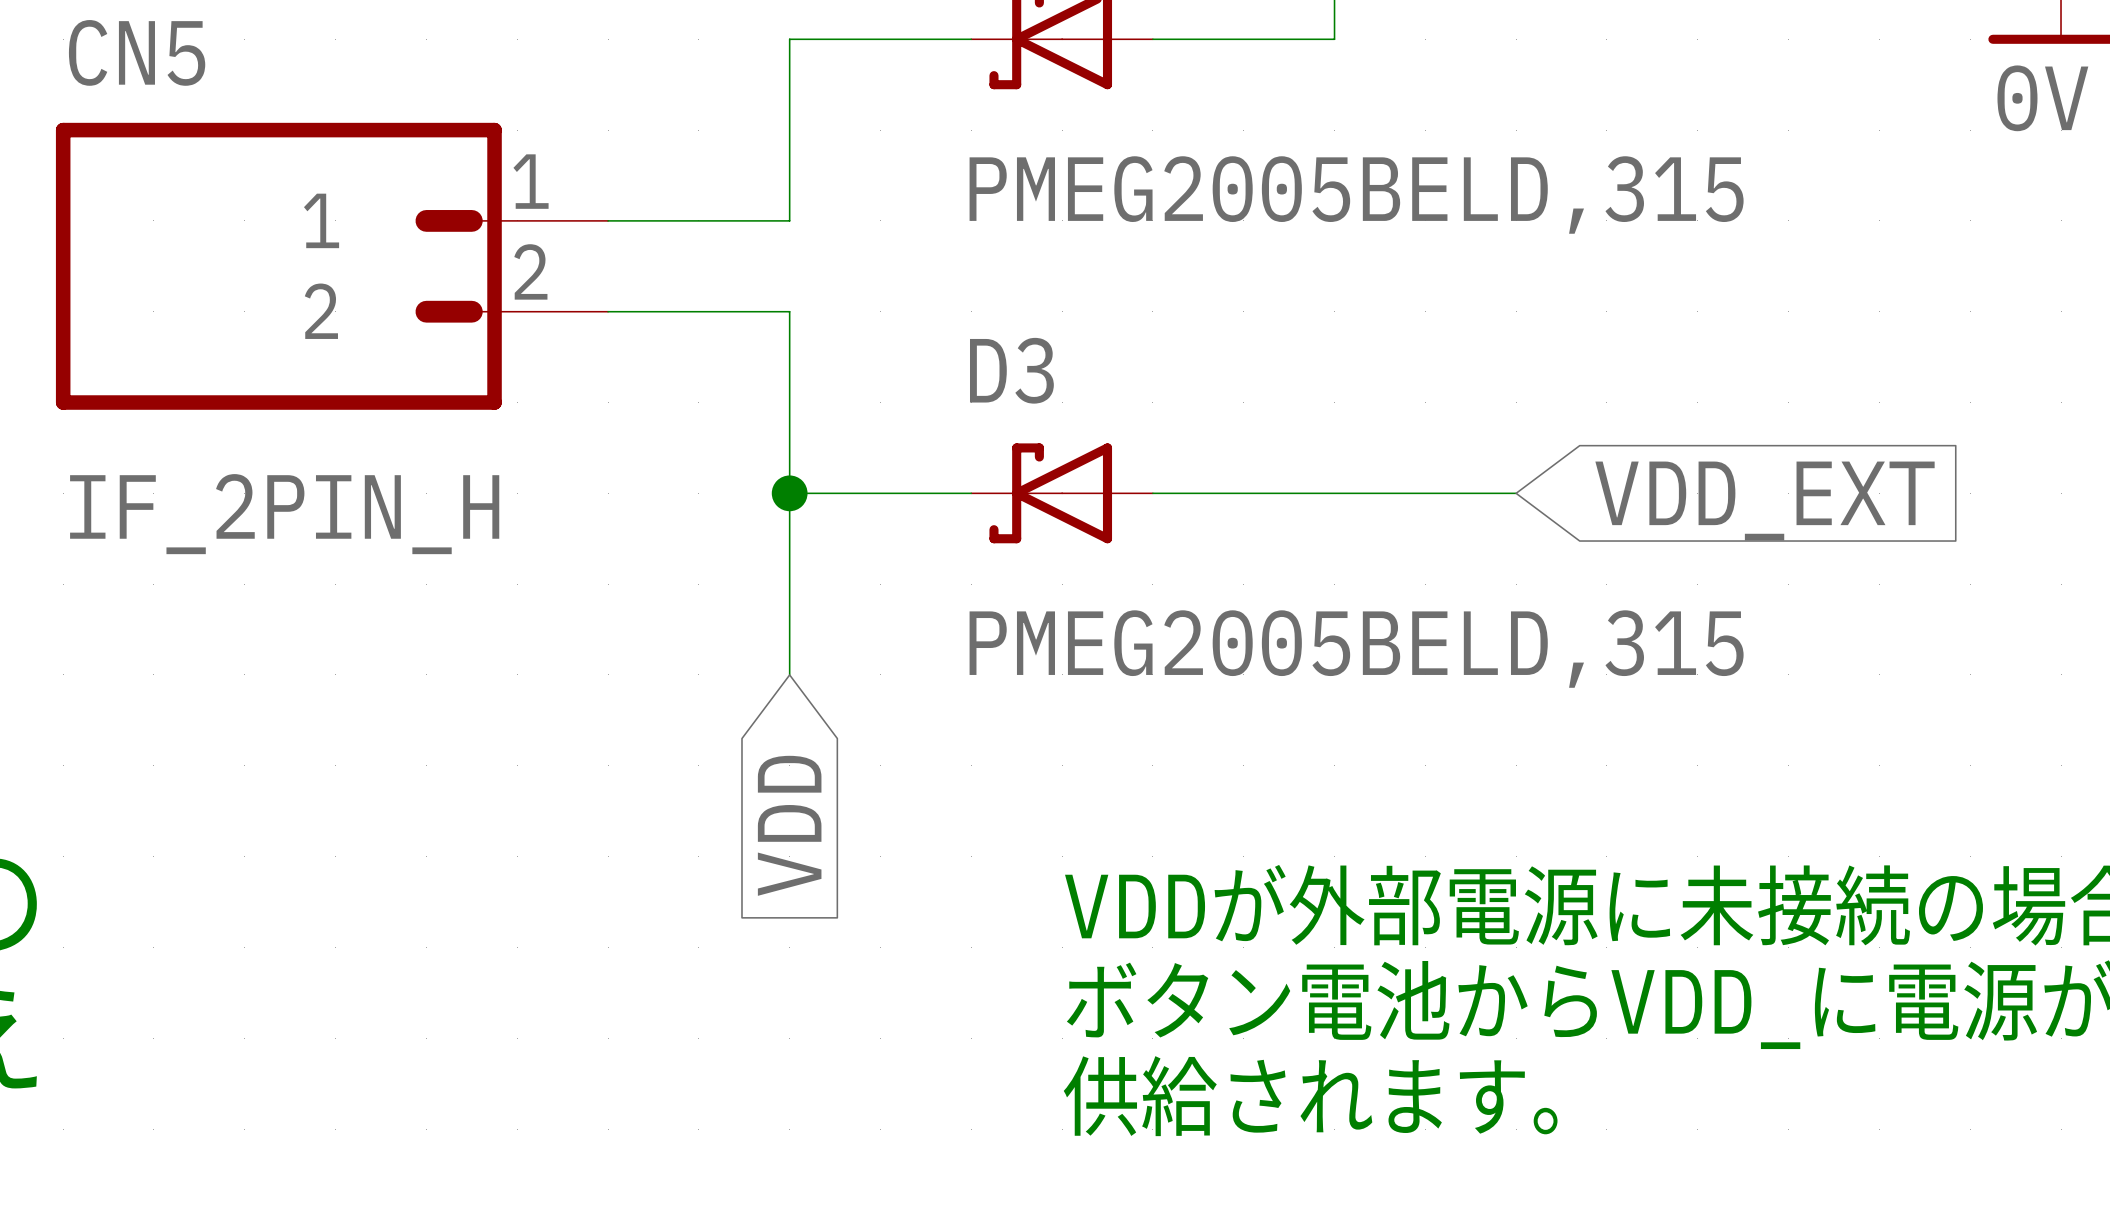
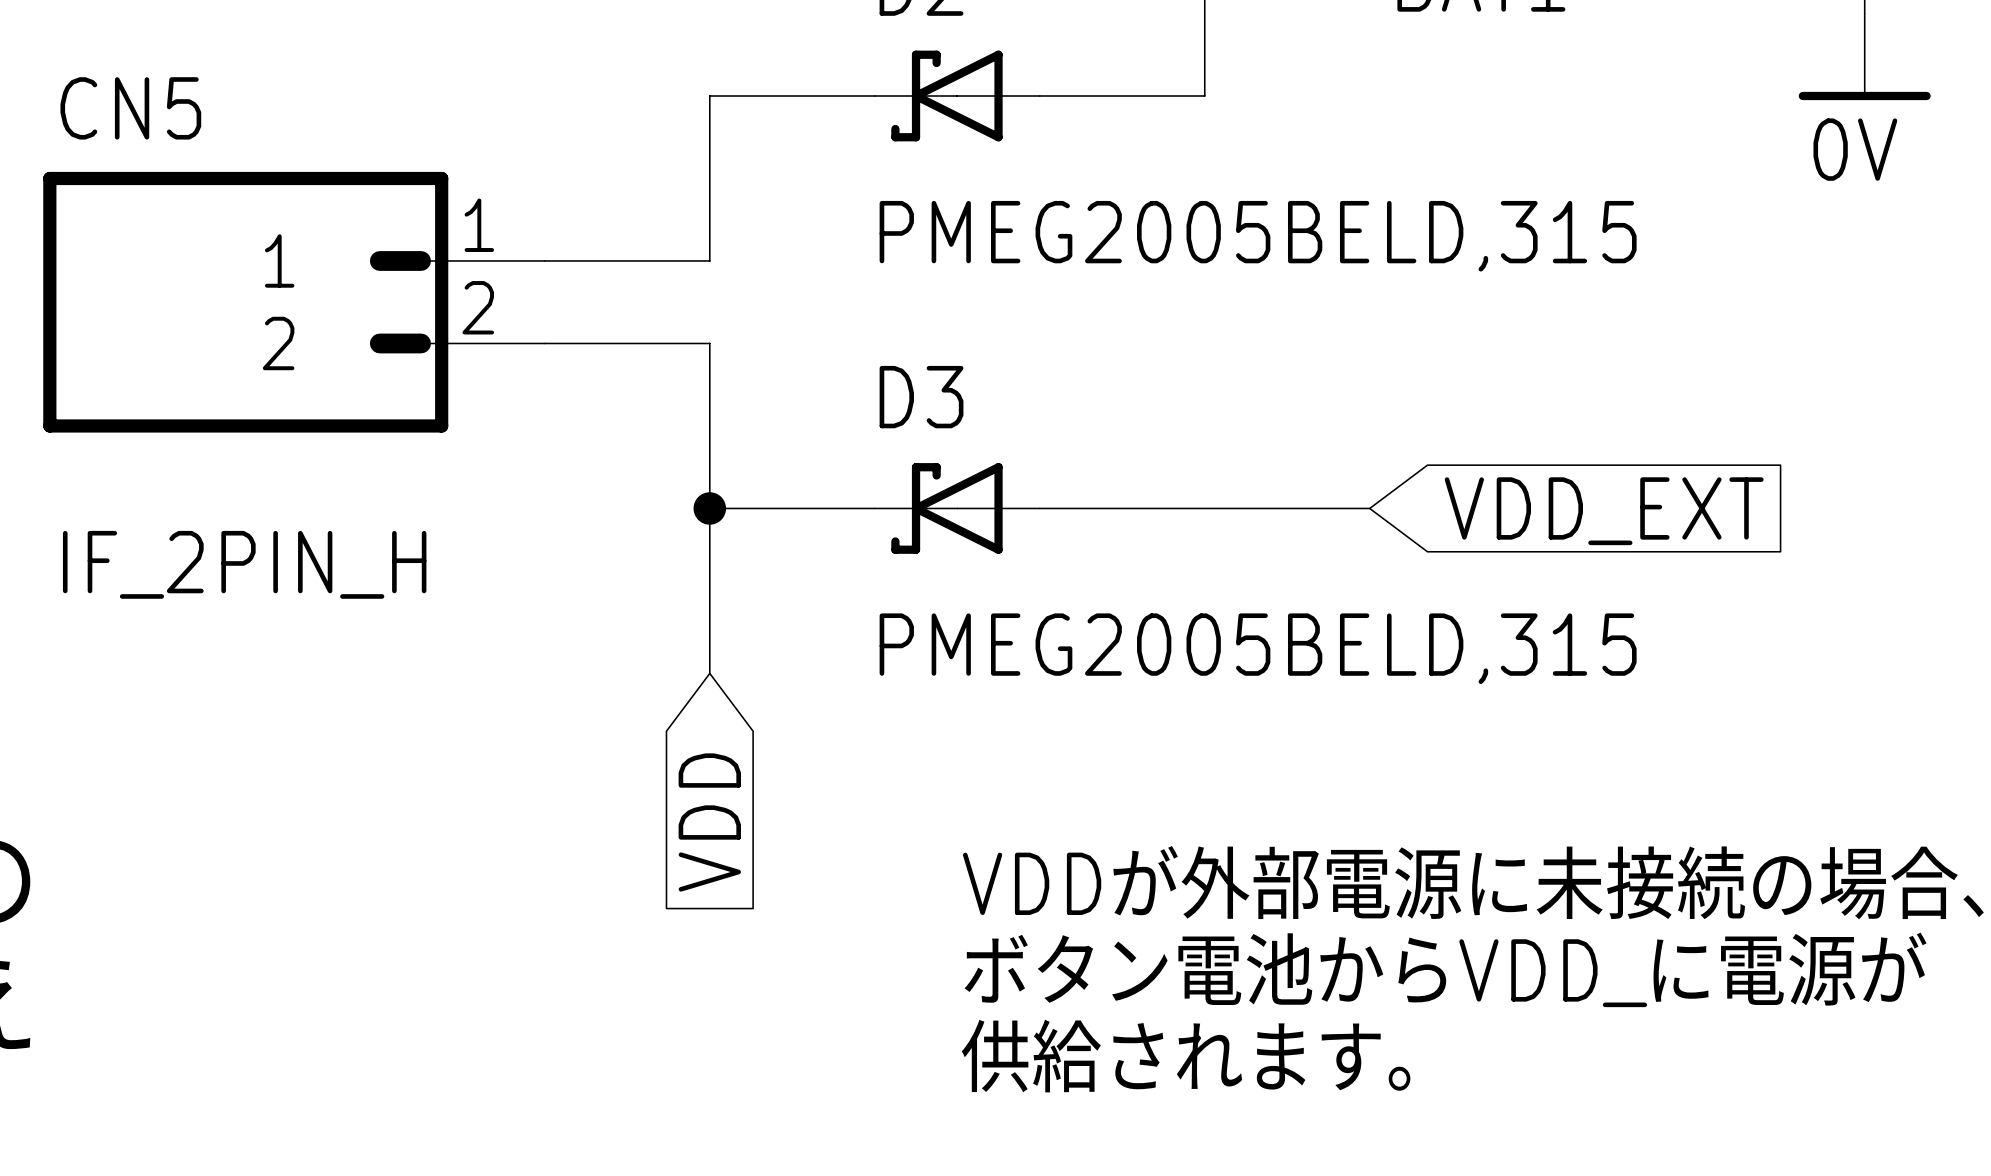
CN5 value position: IF_2PIN_H (284, 514) -> IF_2PIN_H (244, 564)

